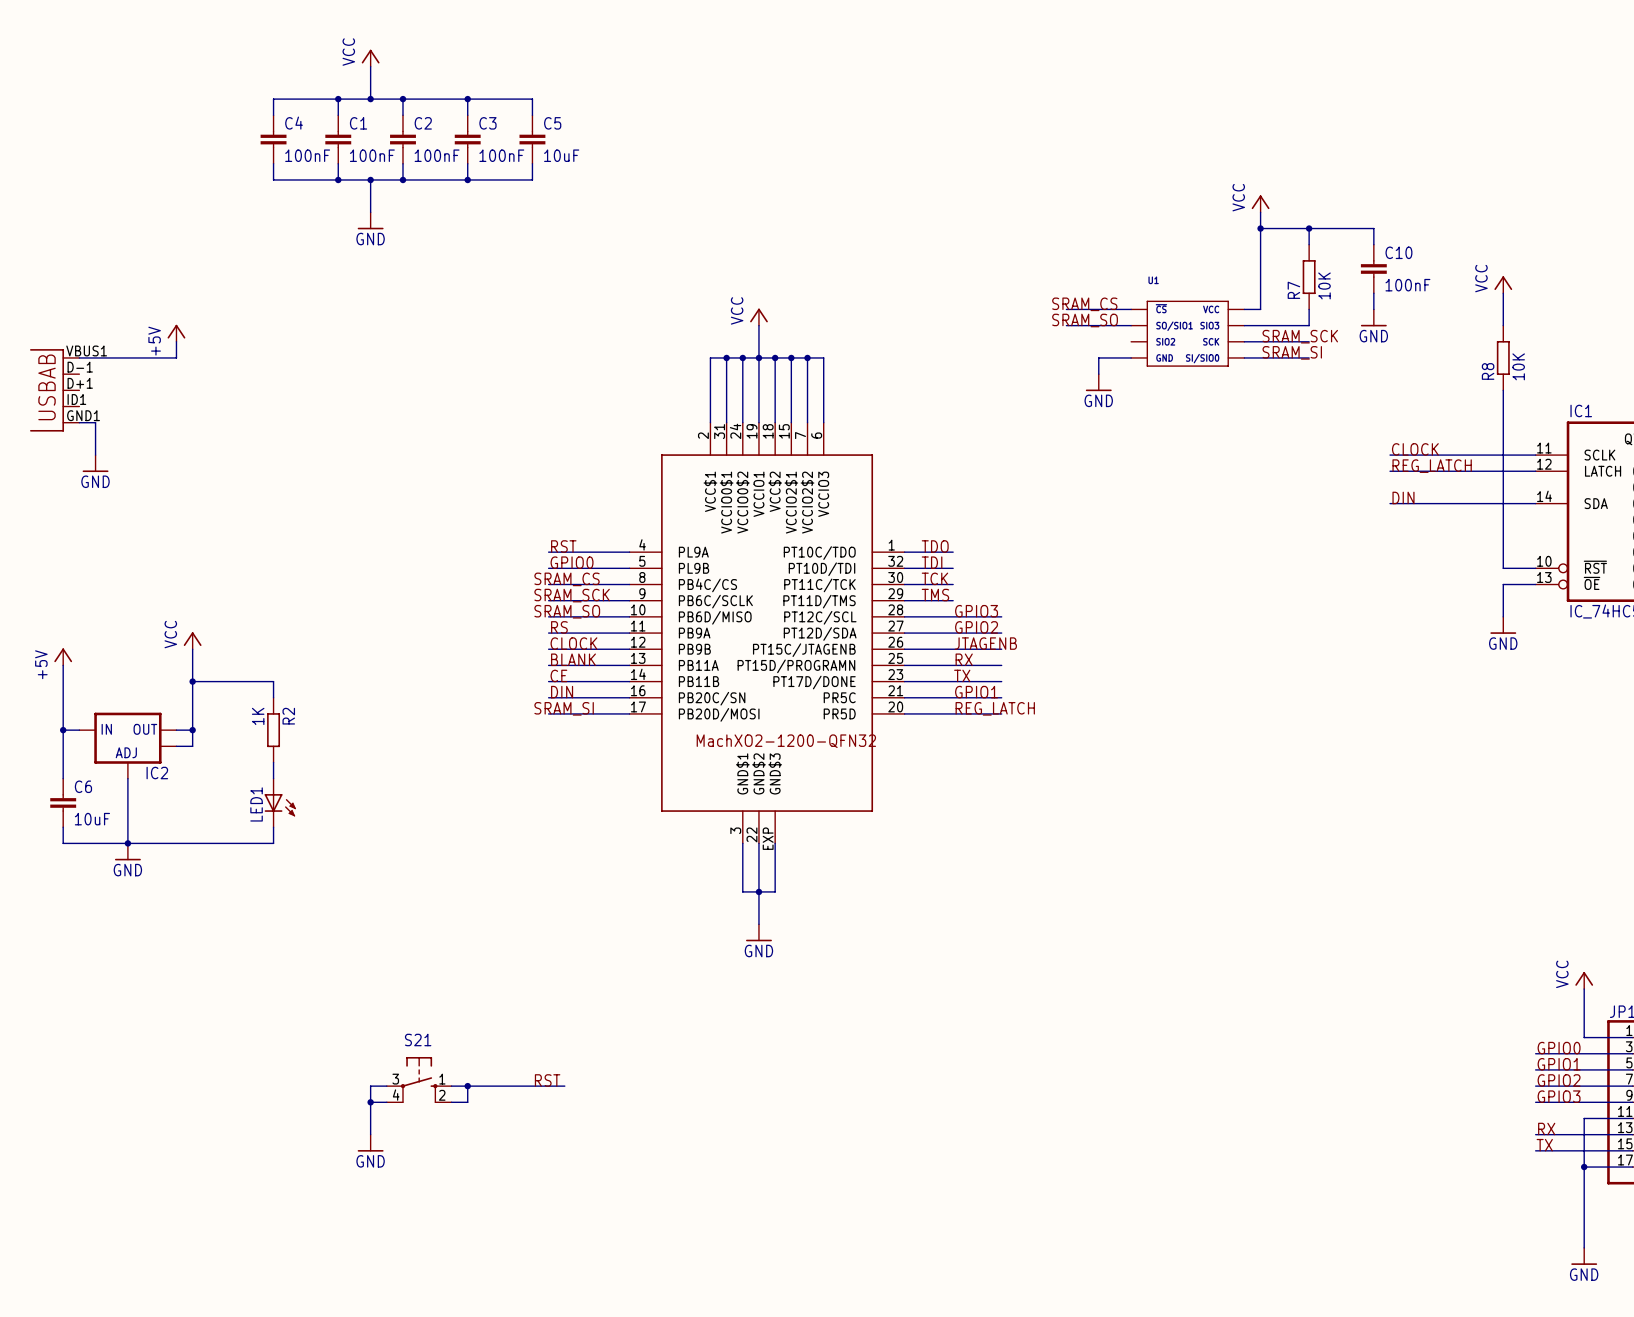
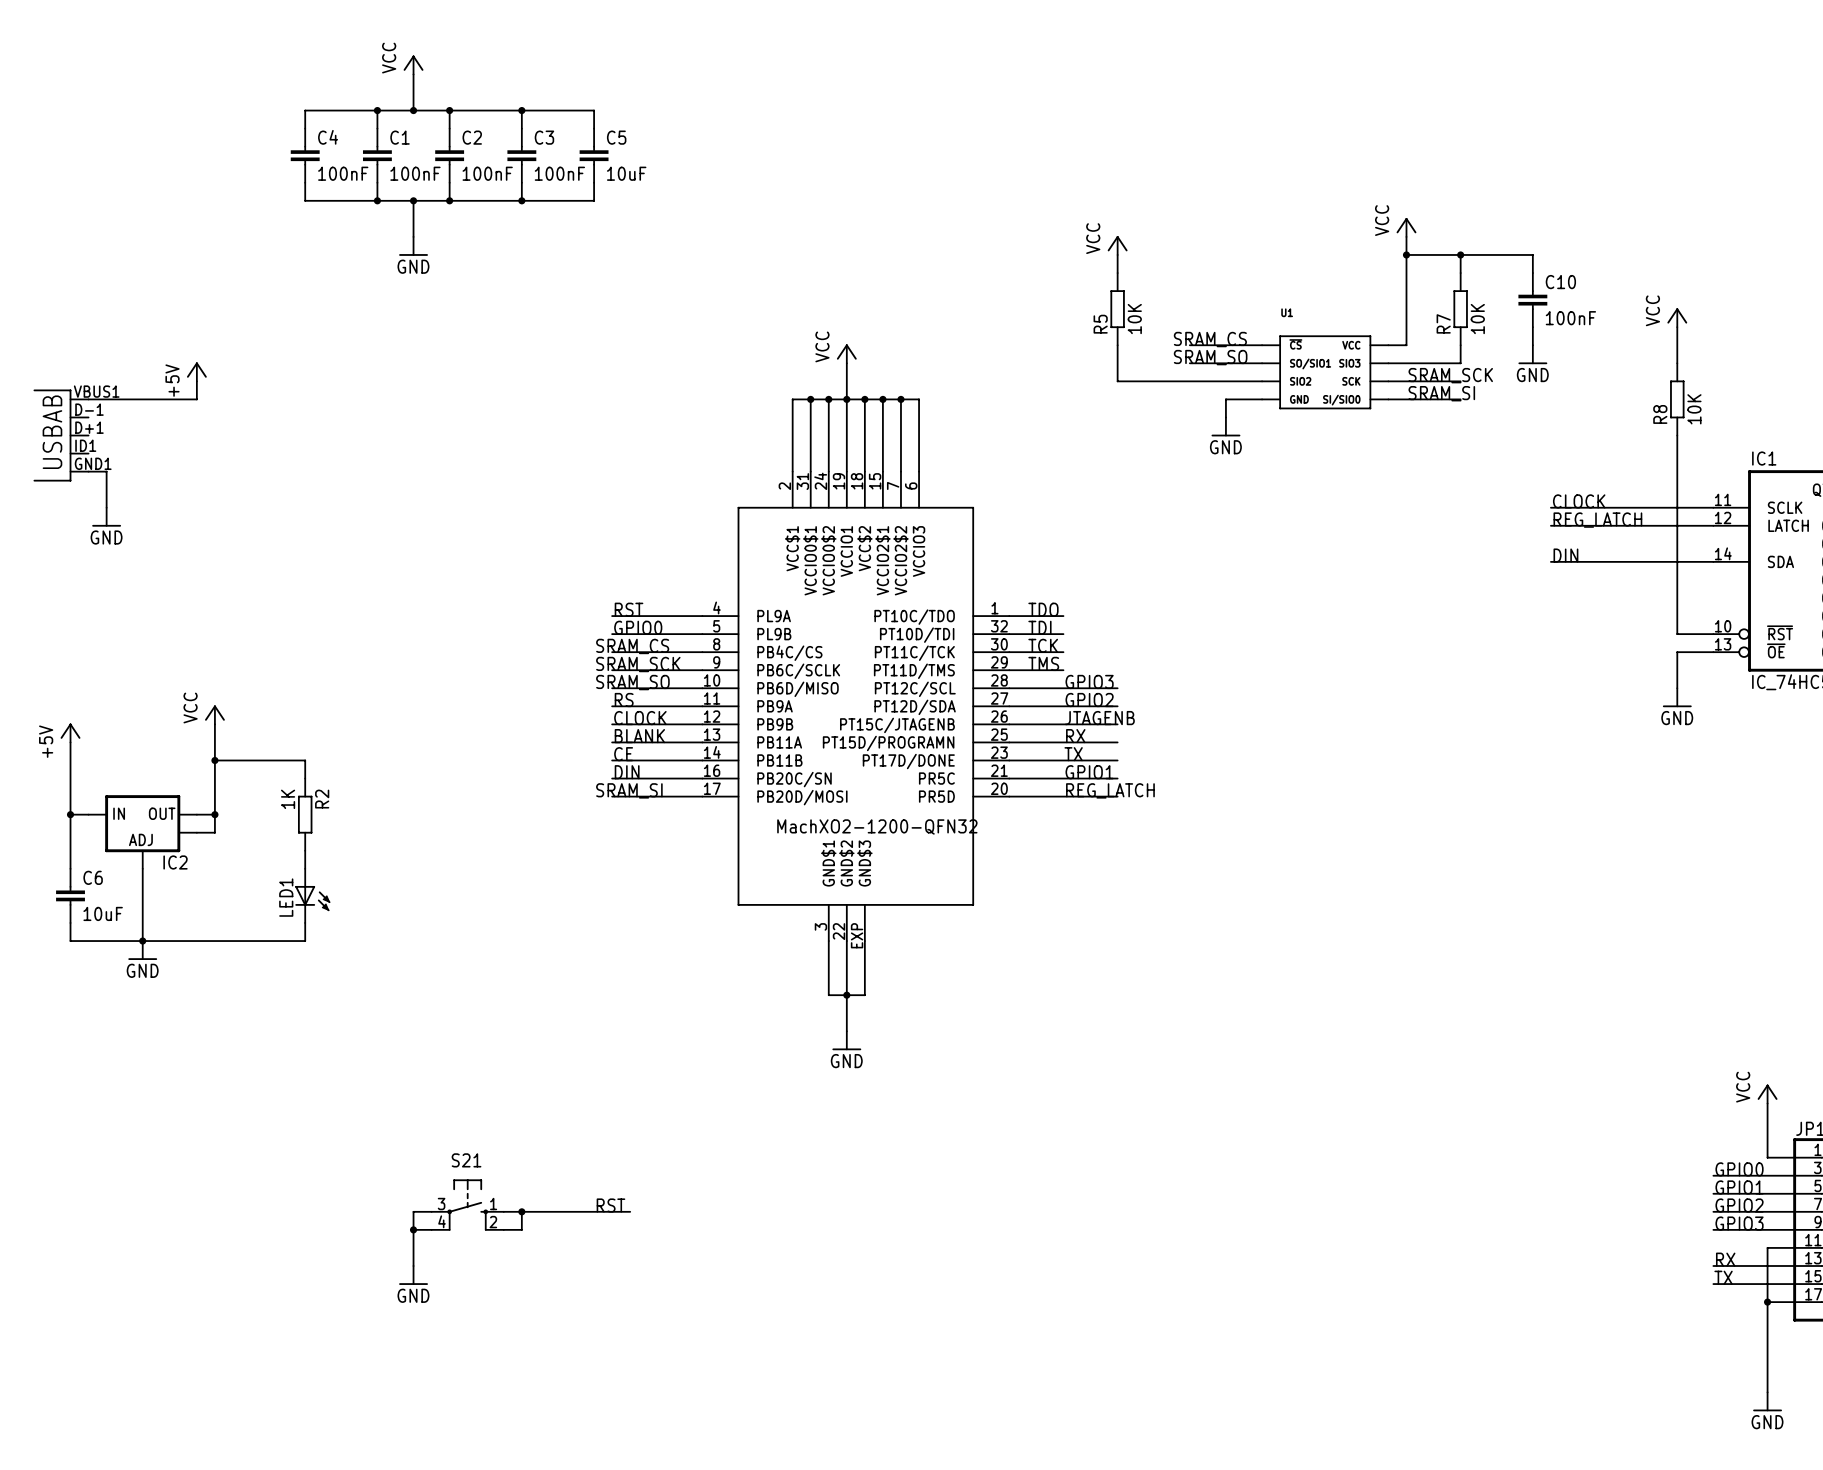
power symbol: none -> VCC (1117, 245)
wire: none -> (1117, 254) (1117, 273)
R5: none -> 10K (1117, 309)
wire: none -> (1117, 345) (1117, 381) (1262, 381)

